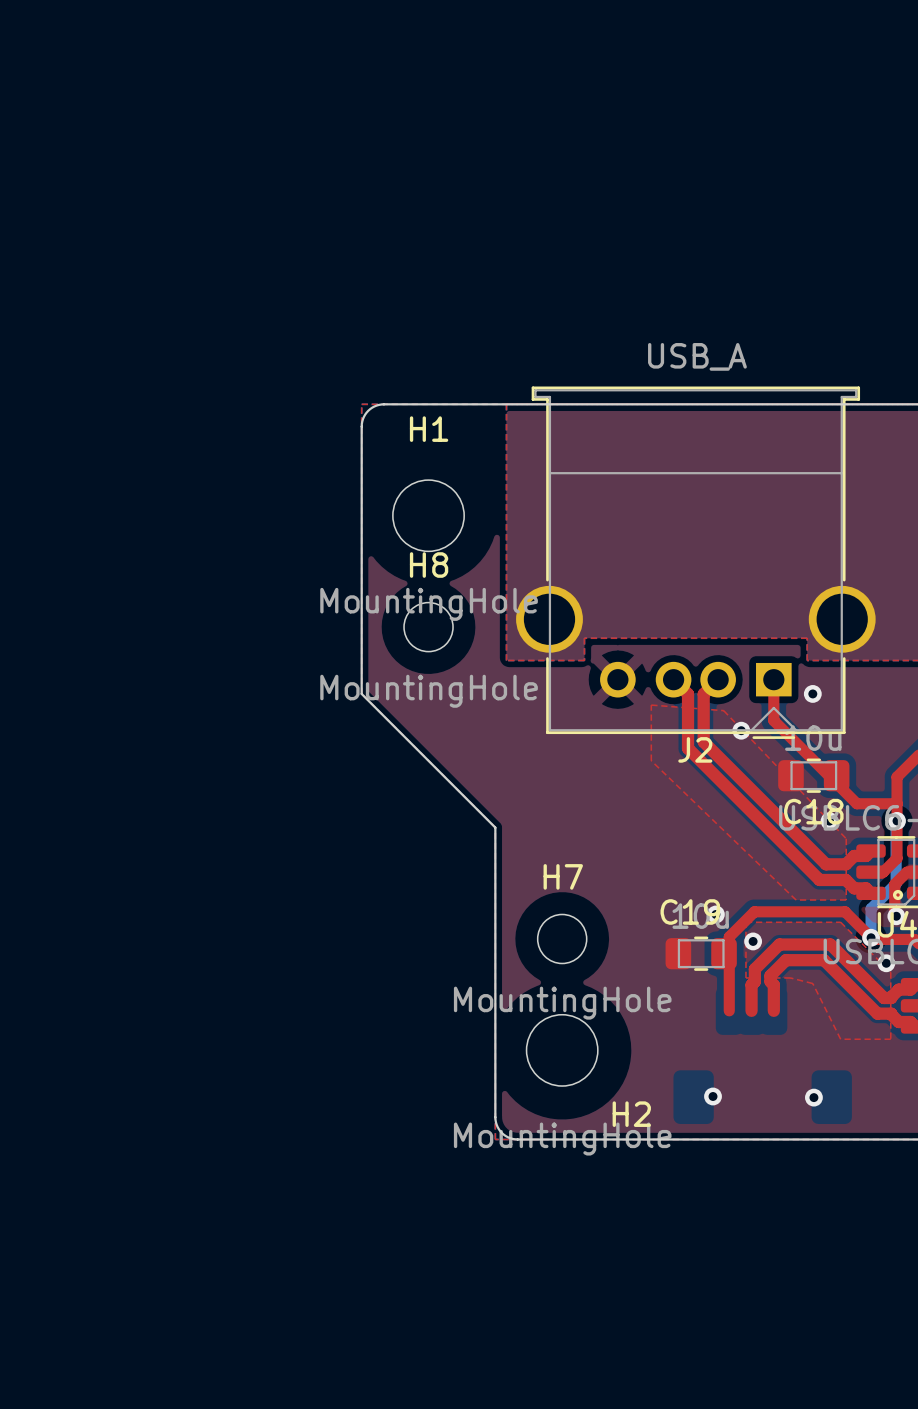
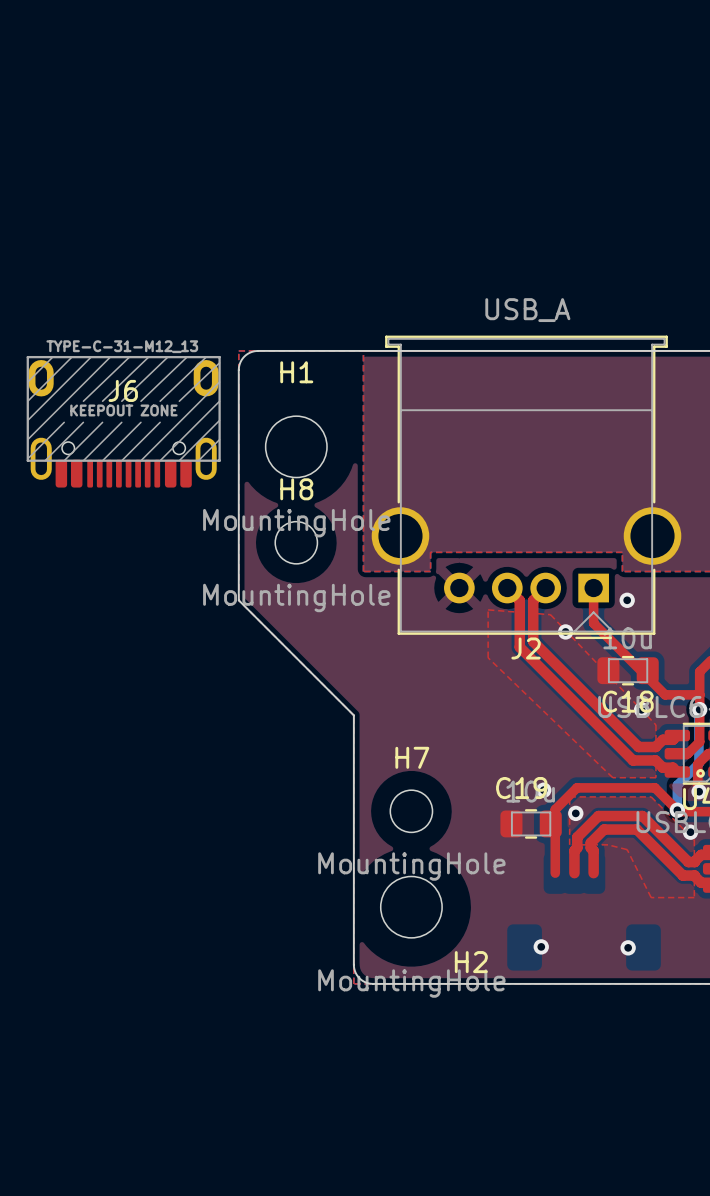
J6: none -> TYPE-C-31-M12_13 (123, 421)

